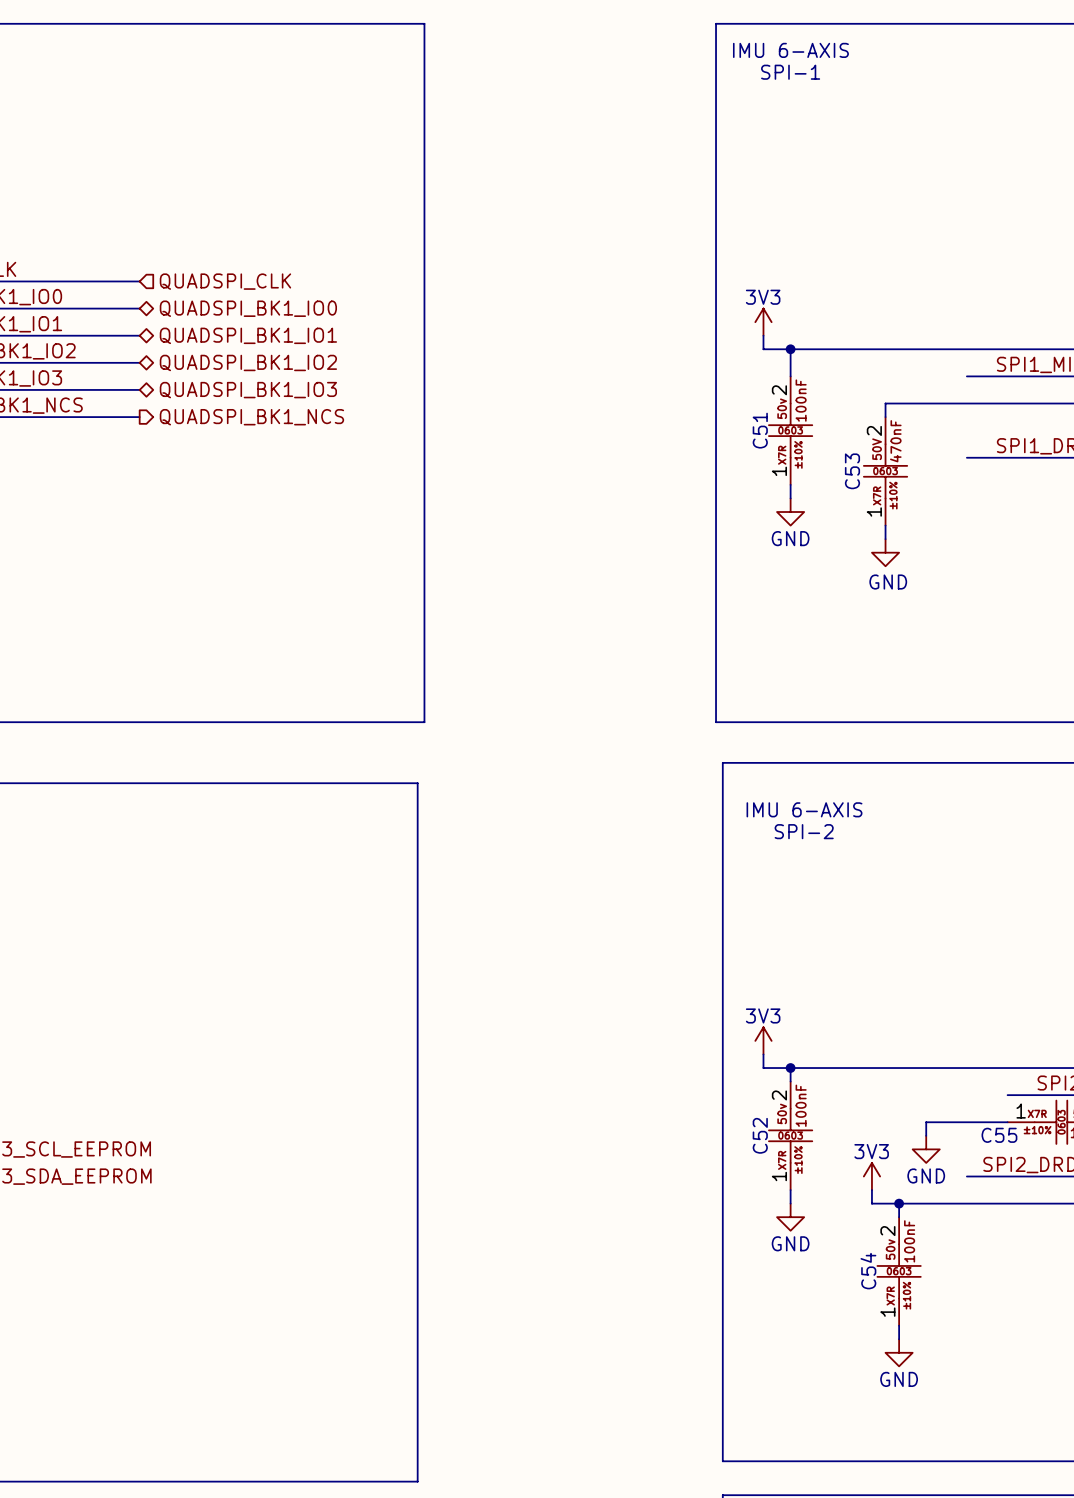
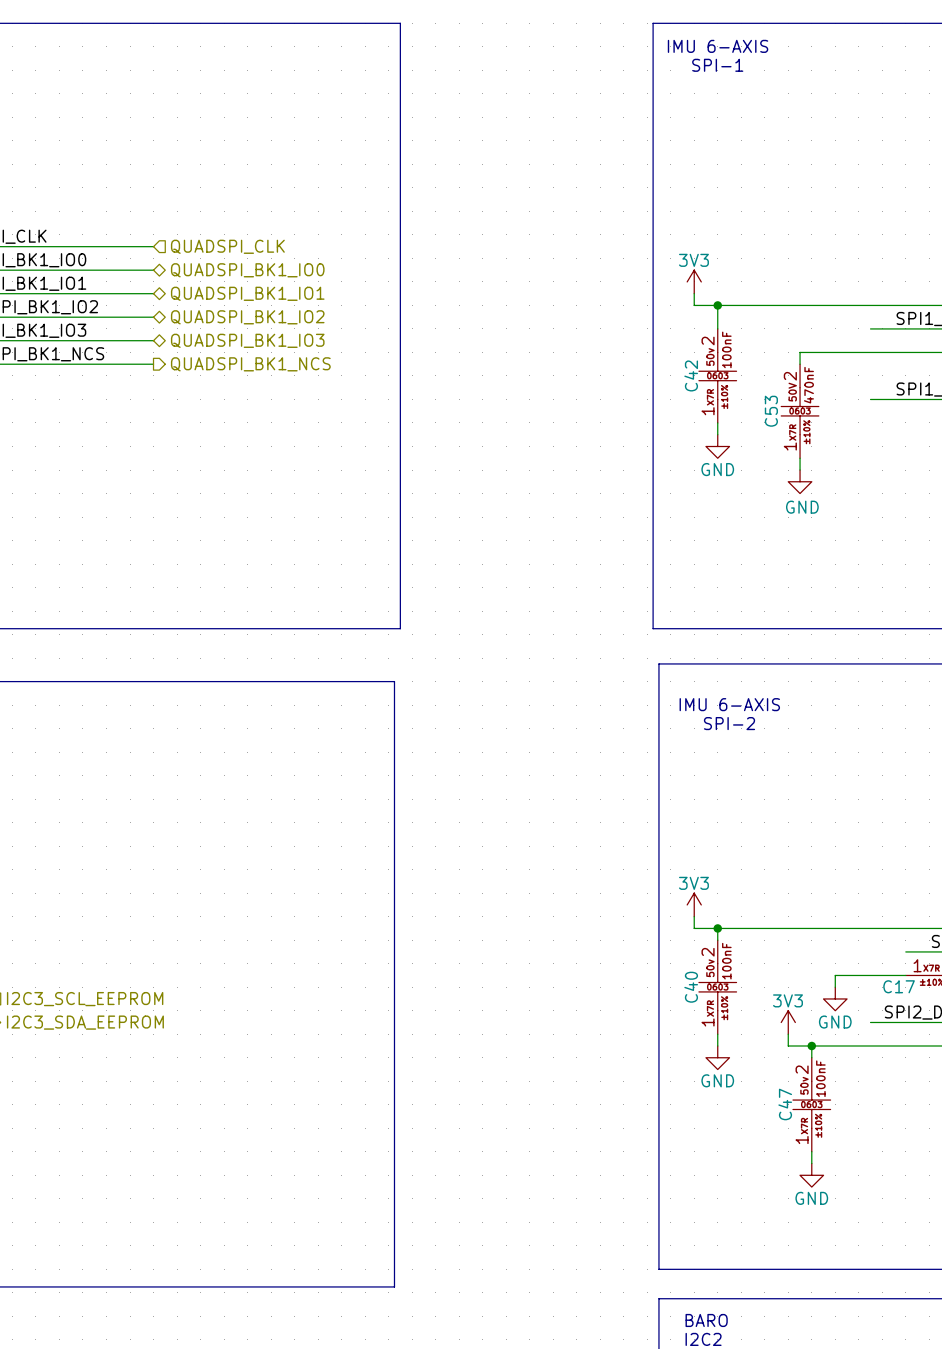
C51 name: C51 (760, 430) -> C42 (691, 375)
C52 name: C52 (760, 1135) -> C40 (691, 987)
C55 name: C55 (999, 1135) -> C17 (899, 986)
C54 name: C54 (868, 1271) -> C47 (785, 1104)

